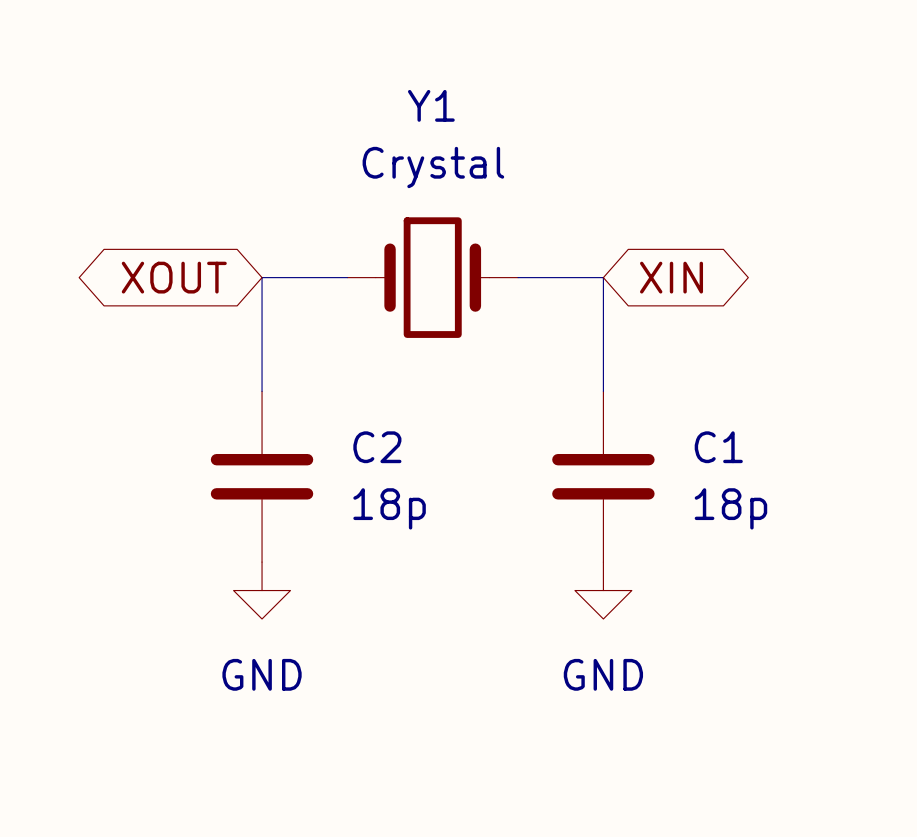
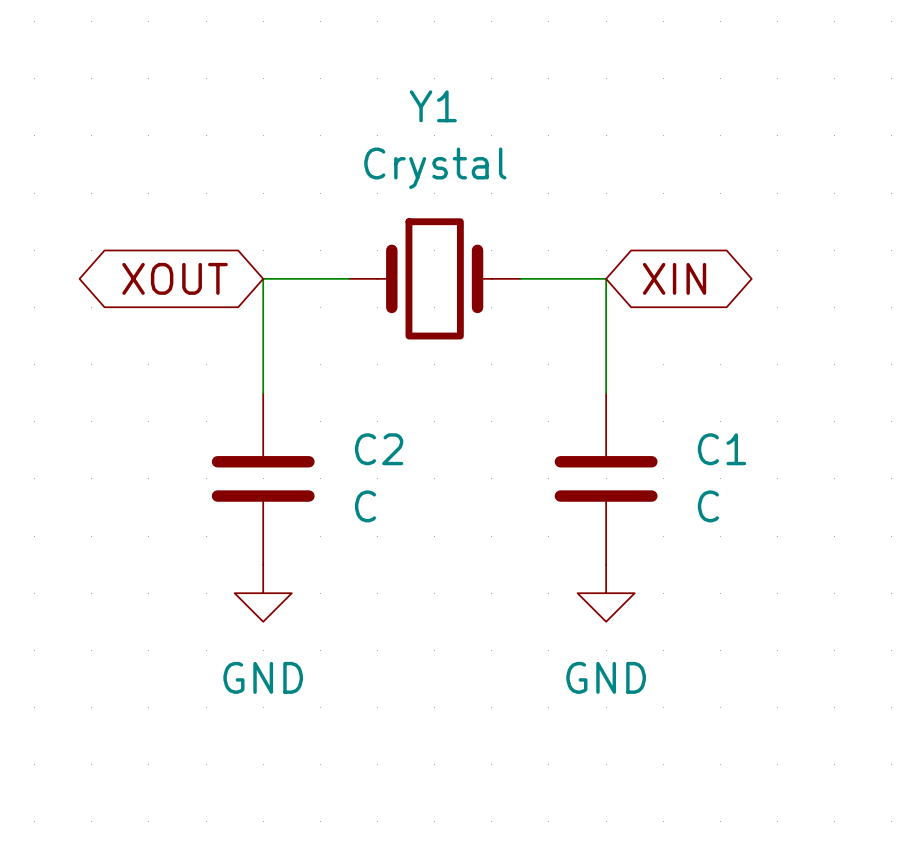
C2 value: 18p (389, 508) -> C (365, 506)
C1 value: 18p (730, 508) -> C (708, 506)

